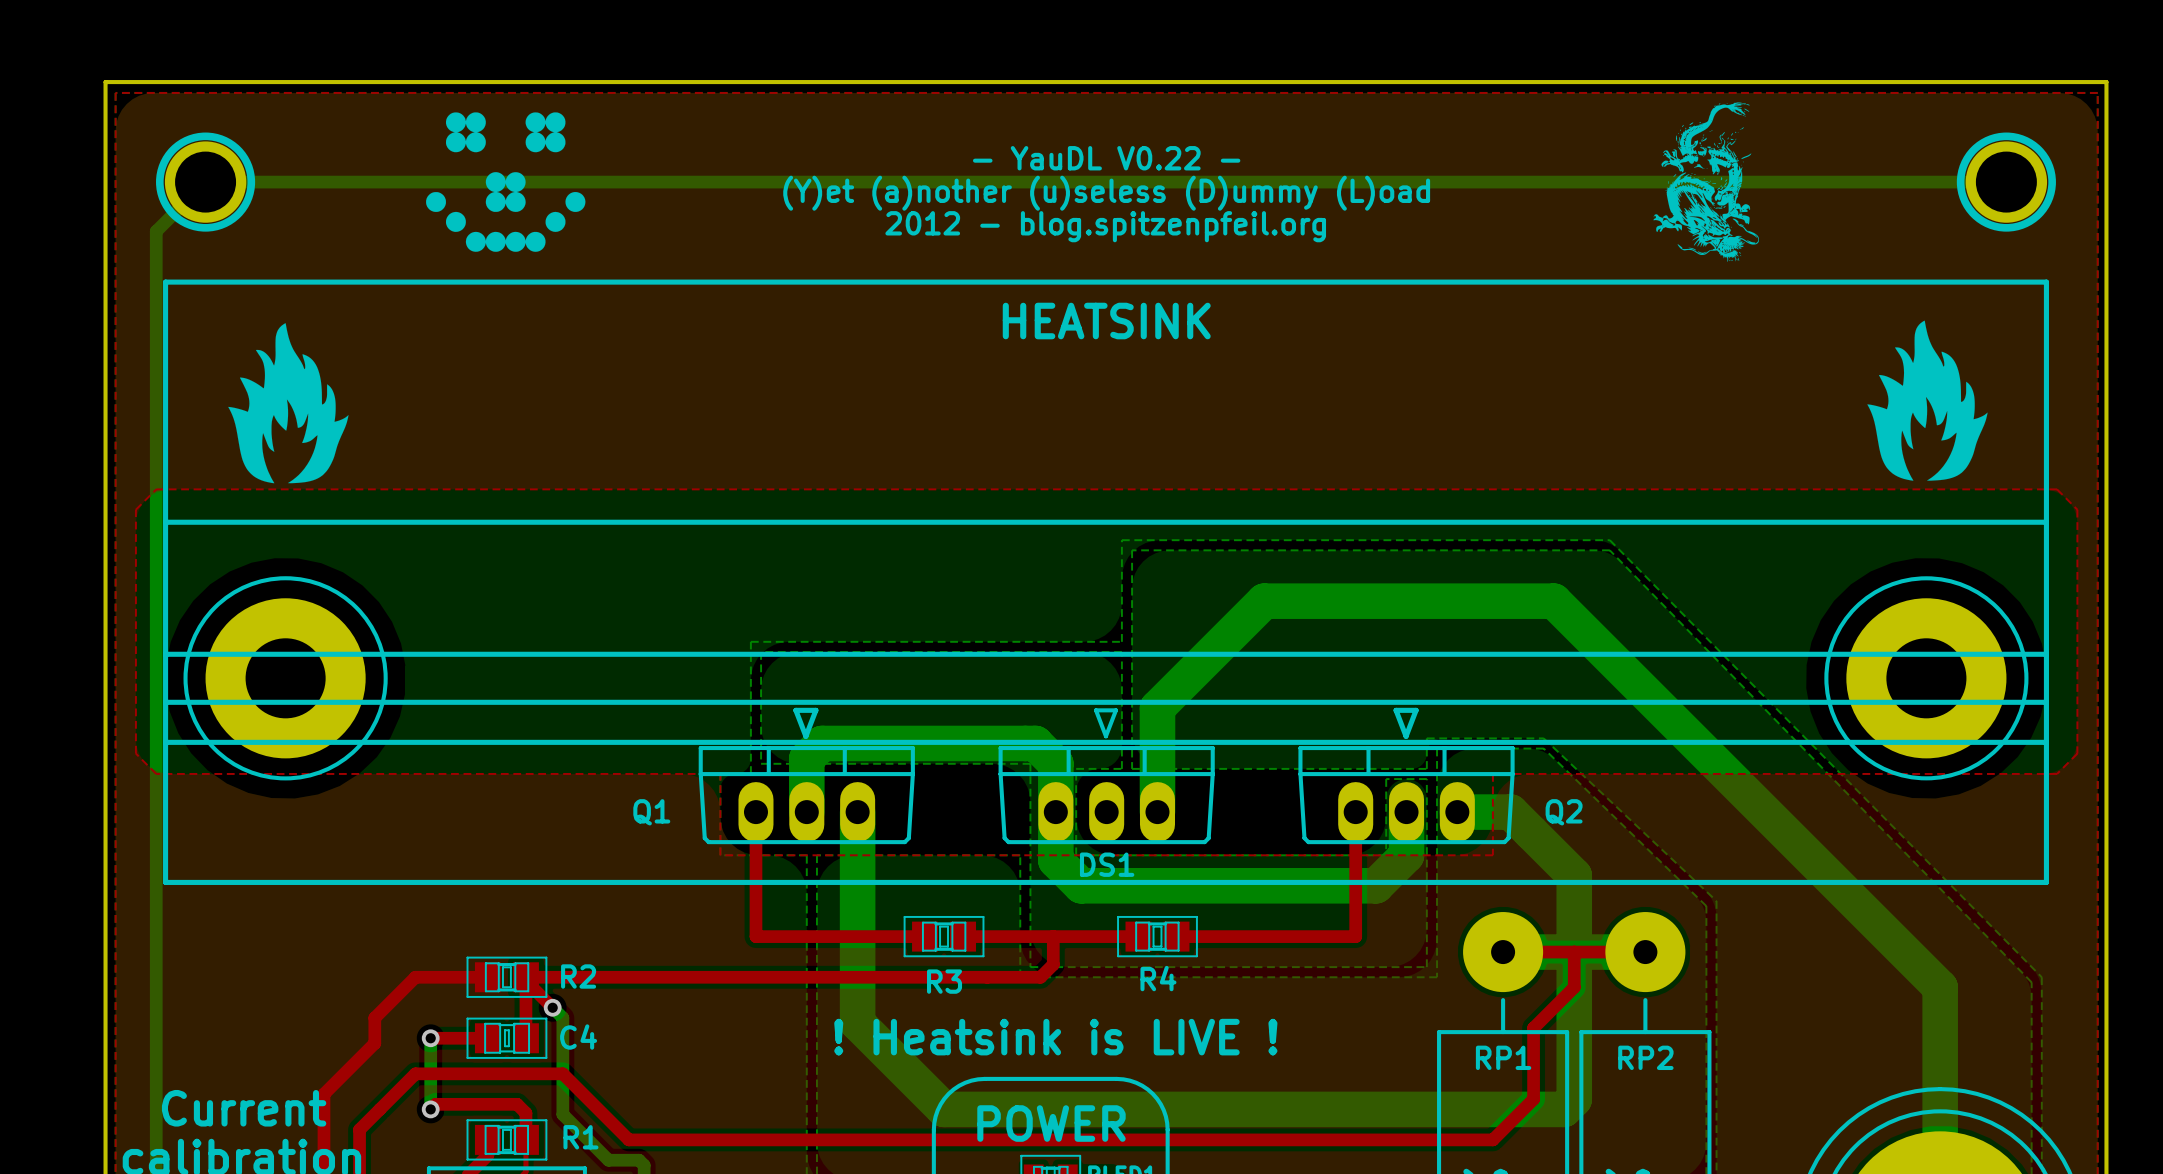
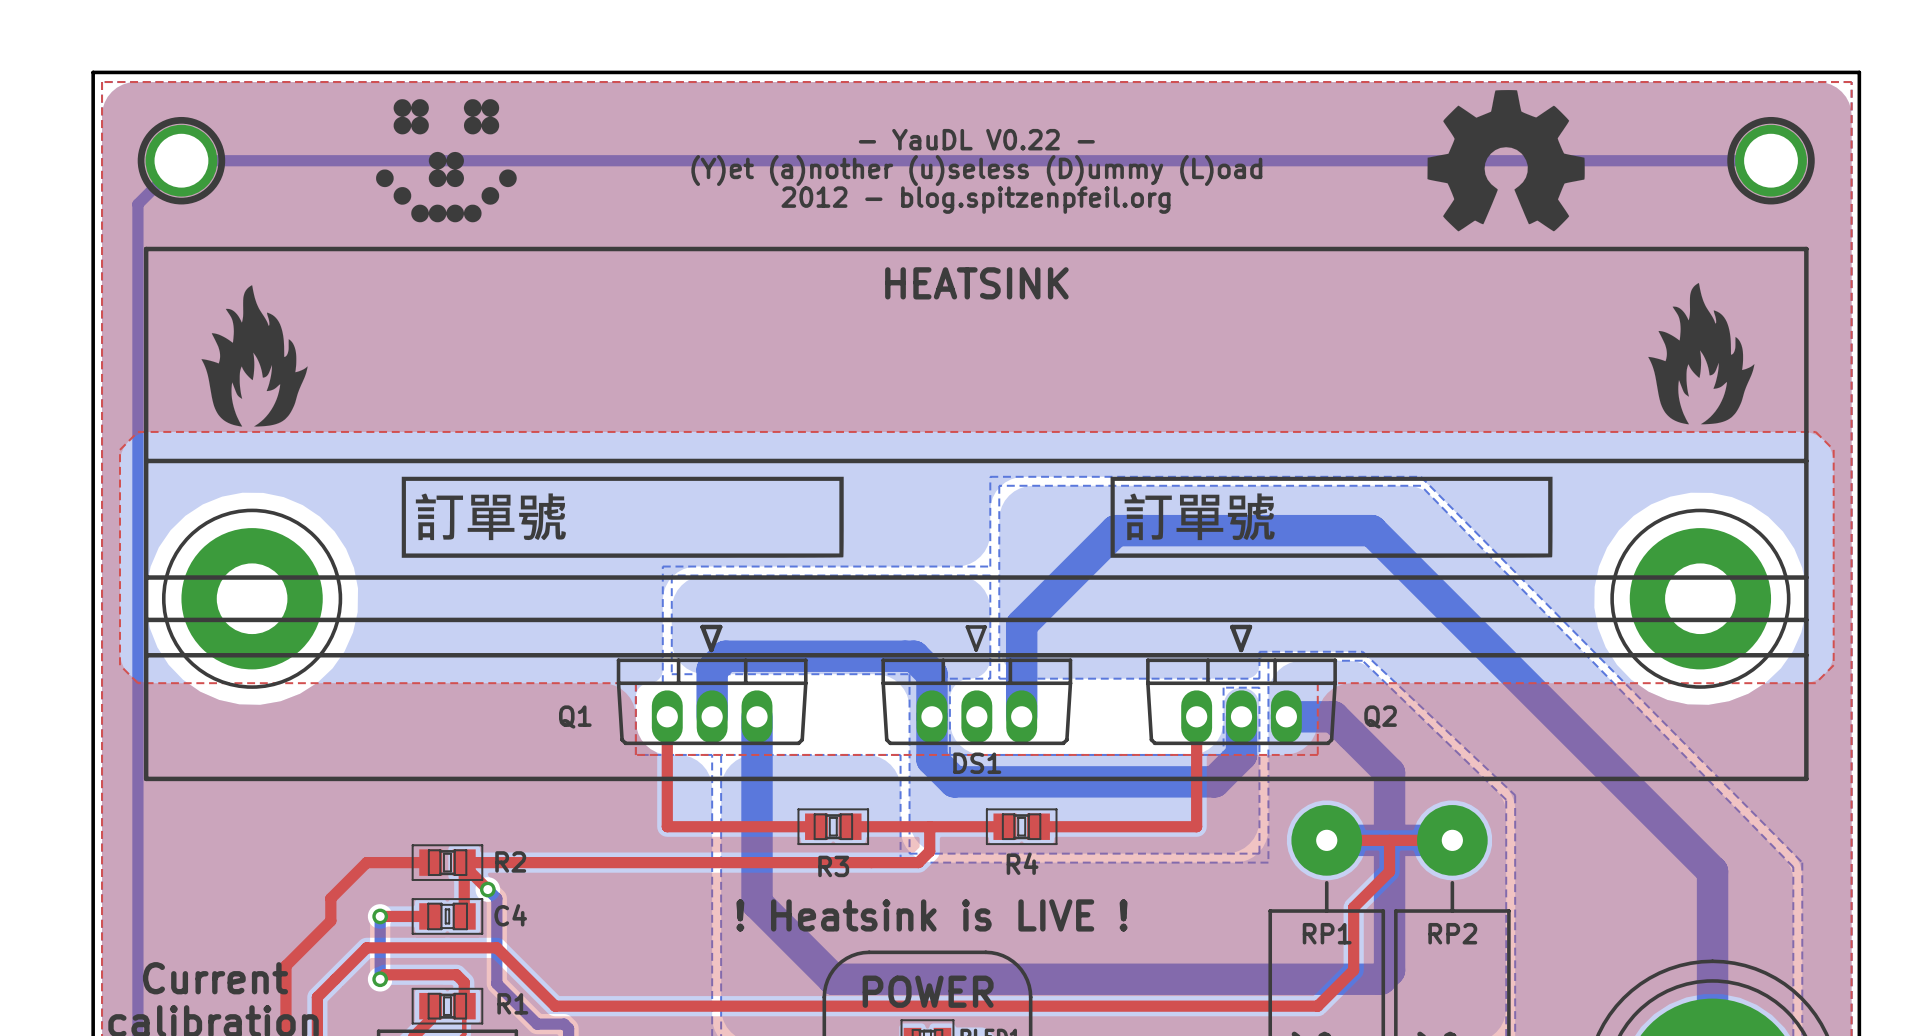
drawing shape: [1653, 102, 1759, 262] -> [1427, 90, 1585, 232]
drawing: none -> [401, 476, 844, 558]
drawing: none -> [1110, 476, 1553, 558]

